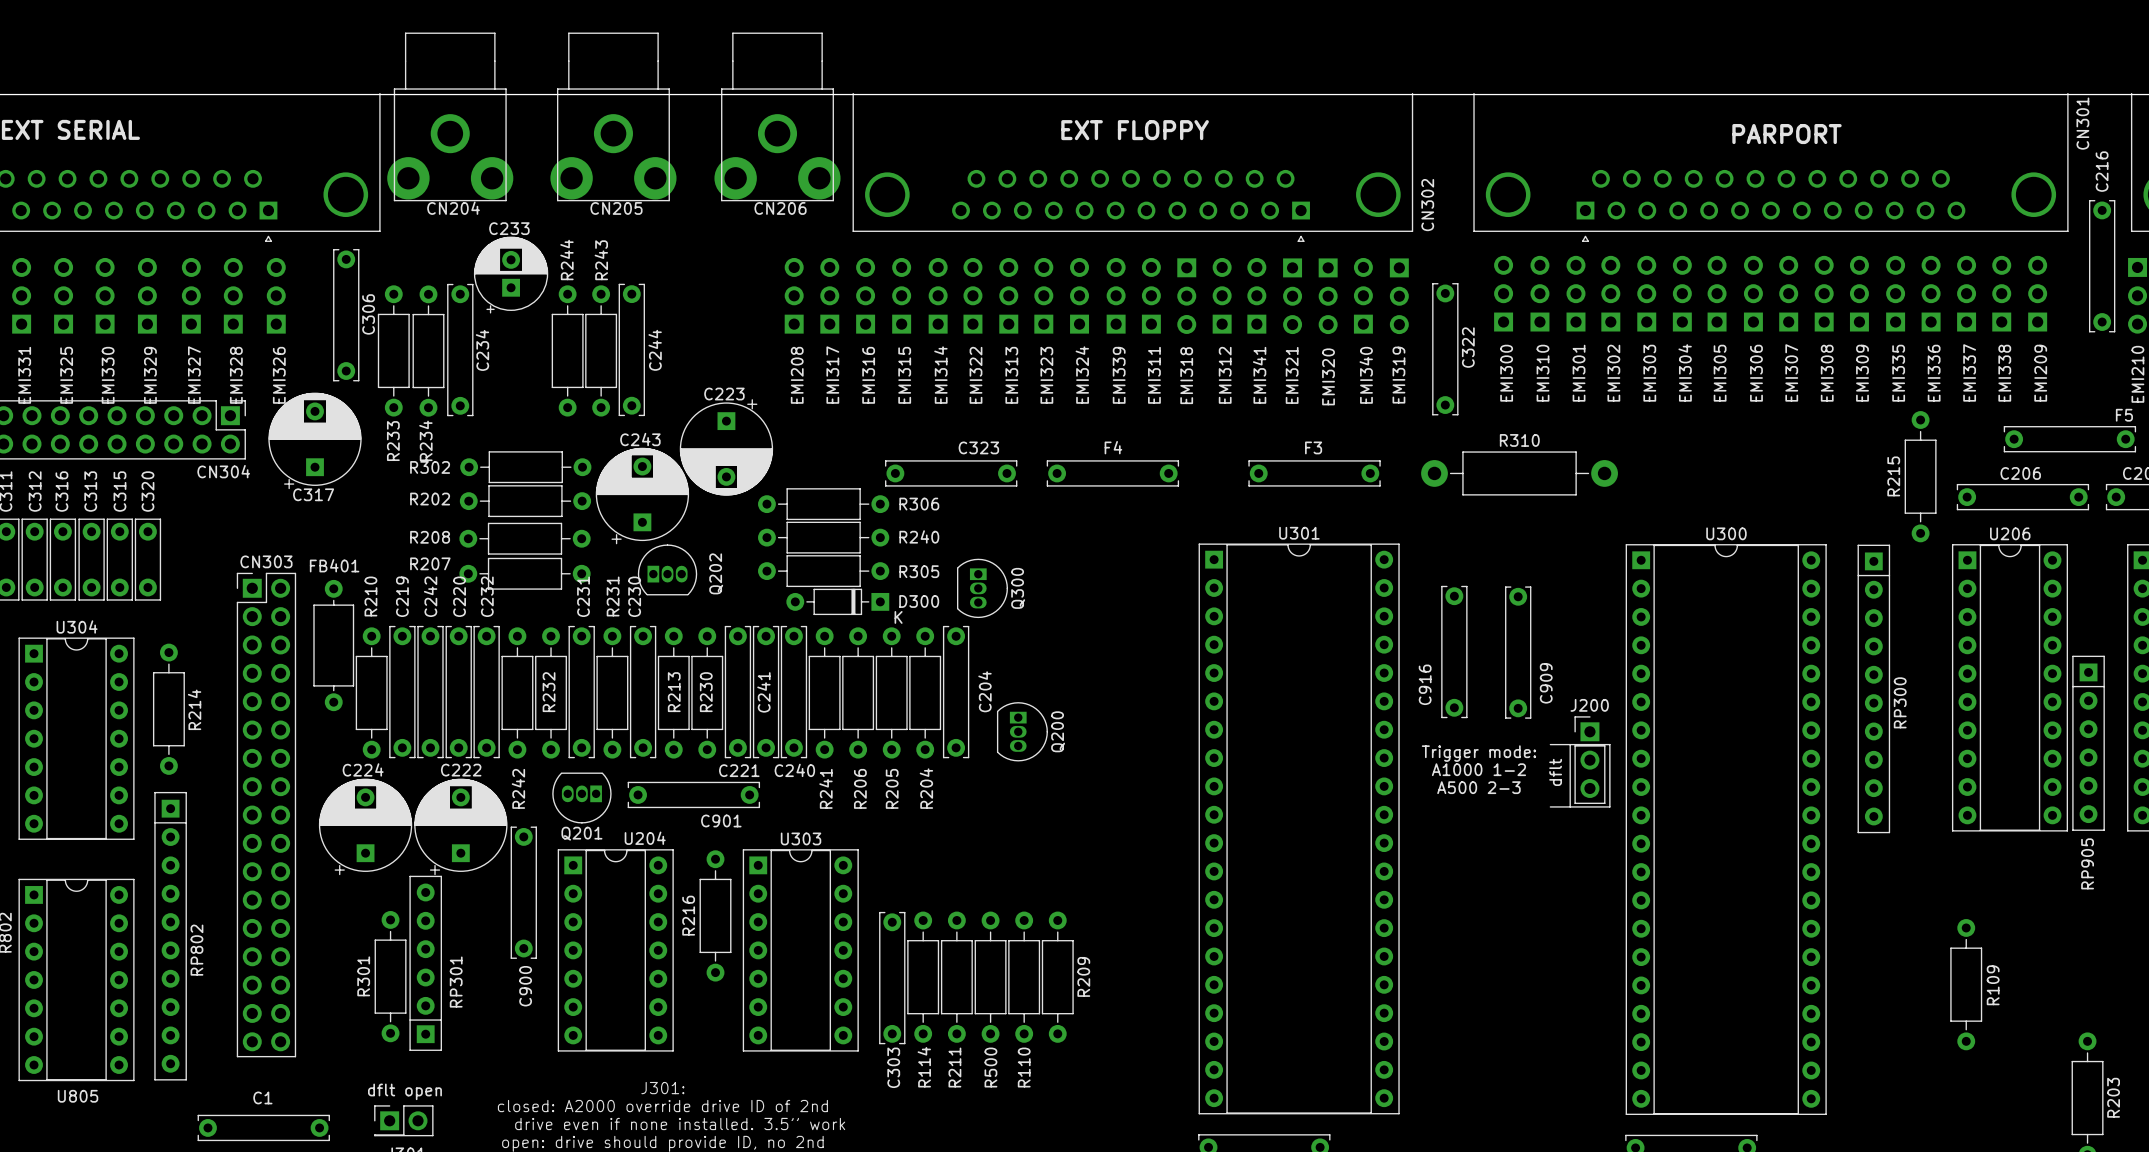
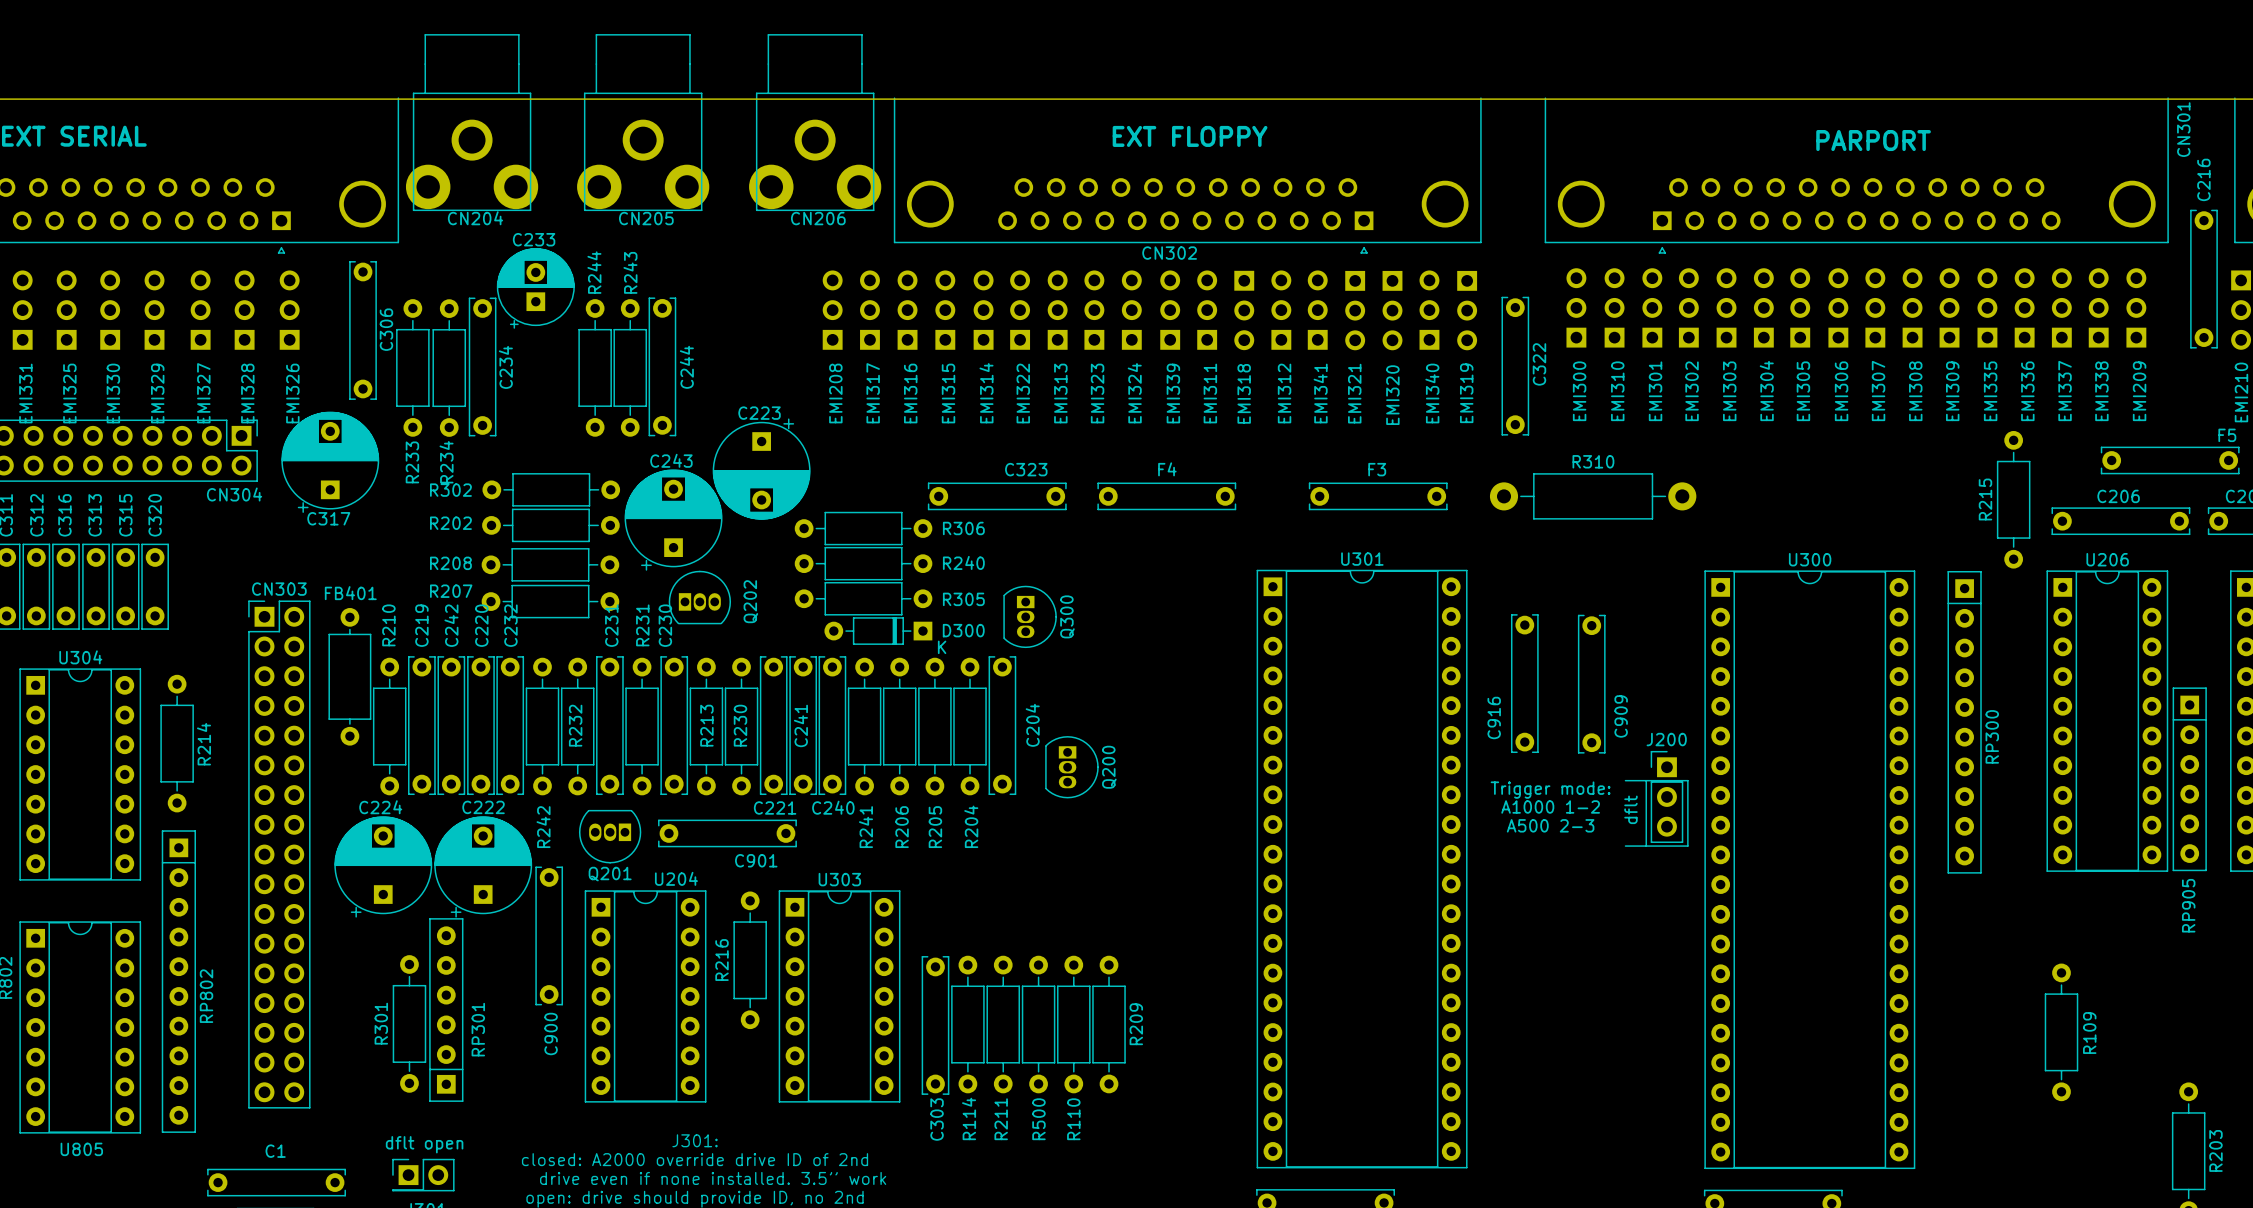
CN302 name rotation: 0° (1427, 205) -> 90° clockwise (1169, 253)
CN302 name position: CN302 (1427, 205) -> CN302 (1169, 253)

